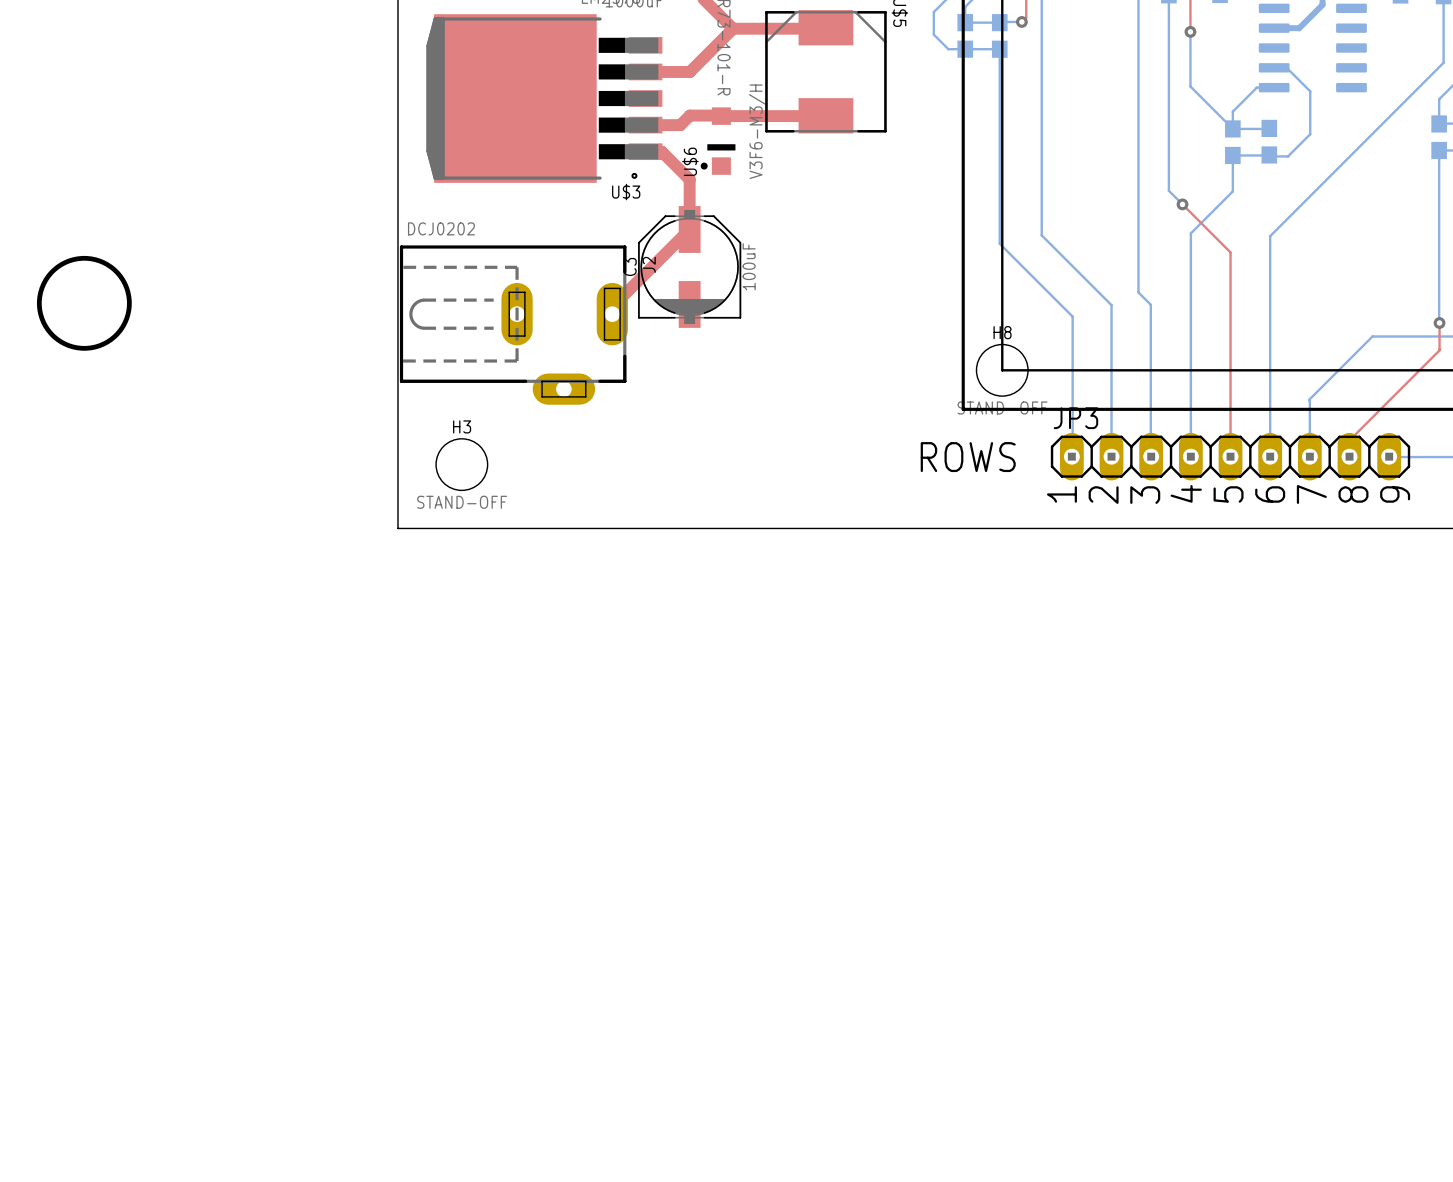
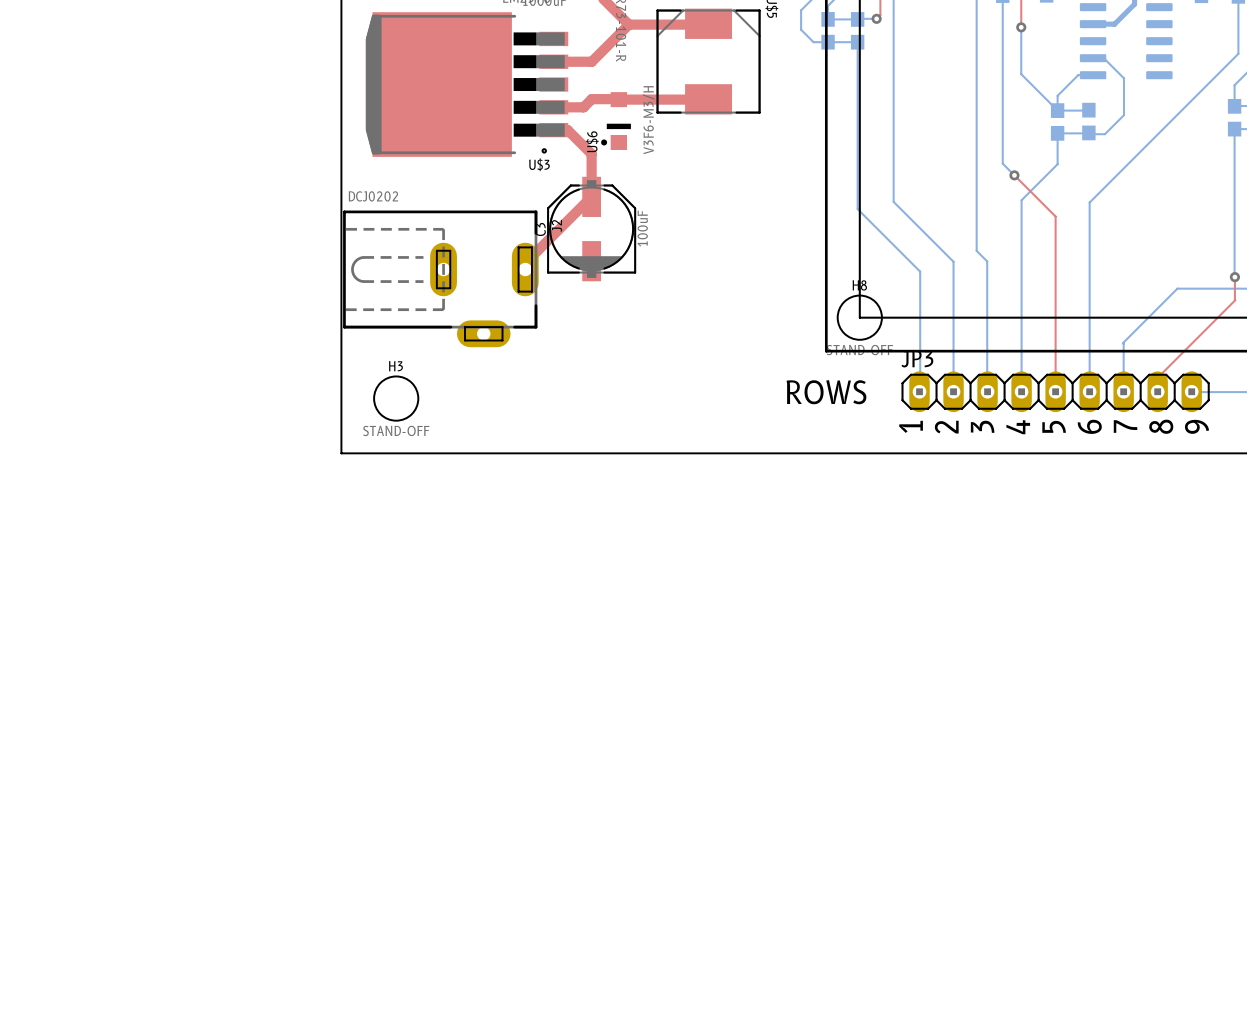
drawing: [36, 255, 132, 351] -> none

